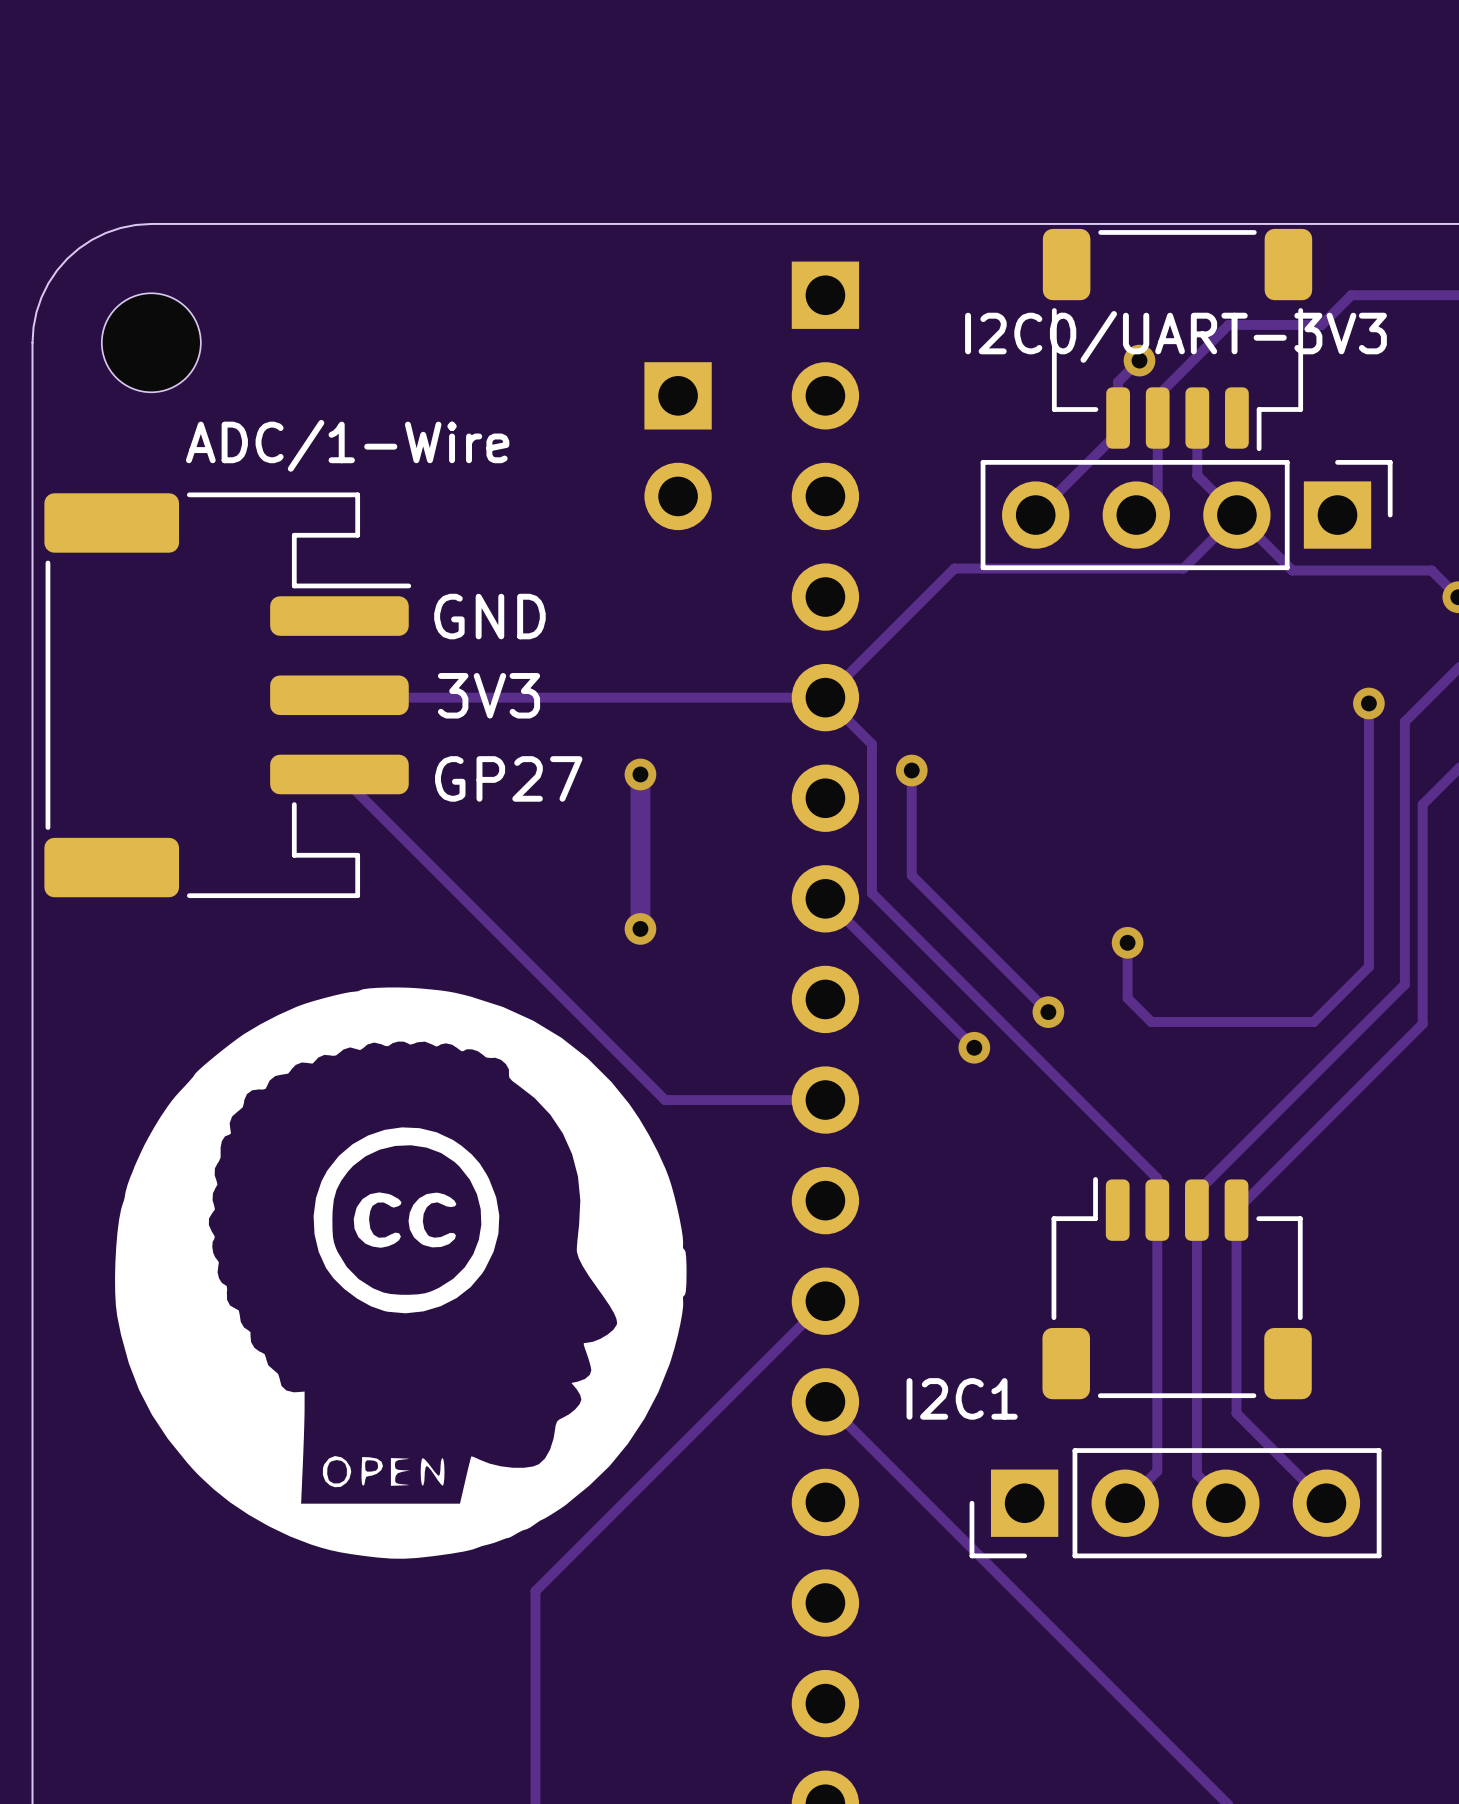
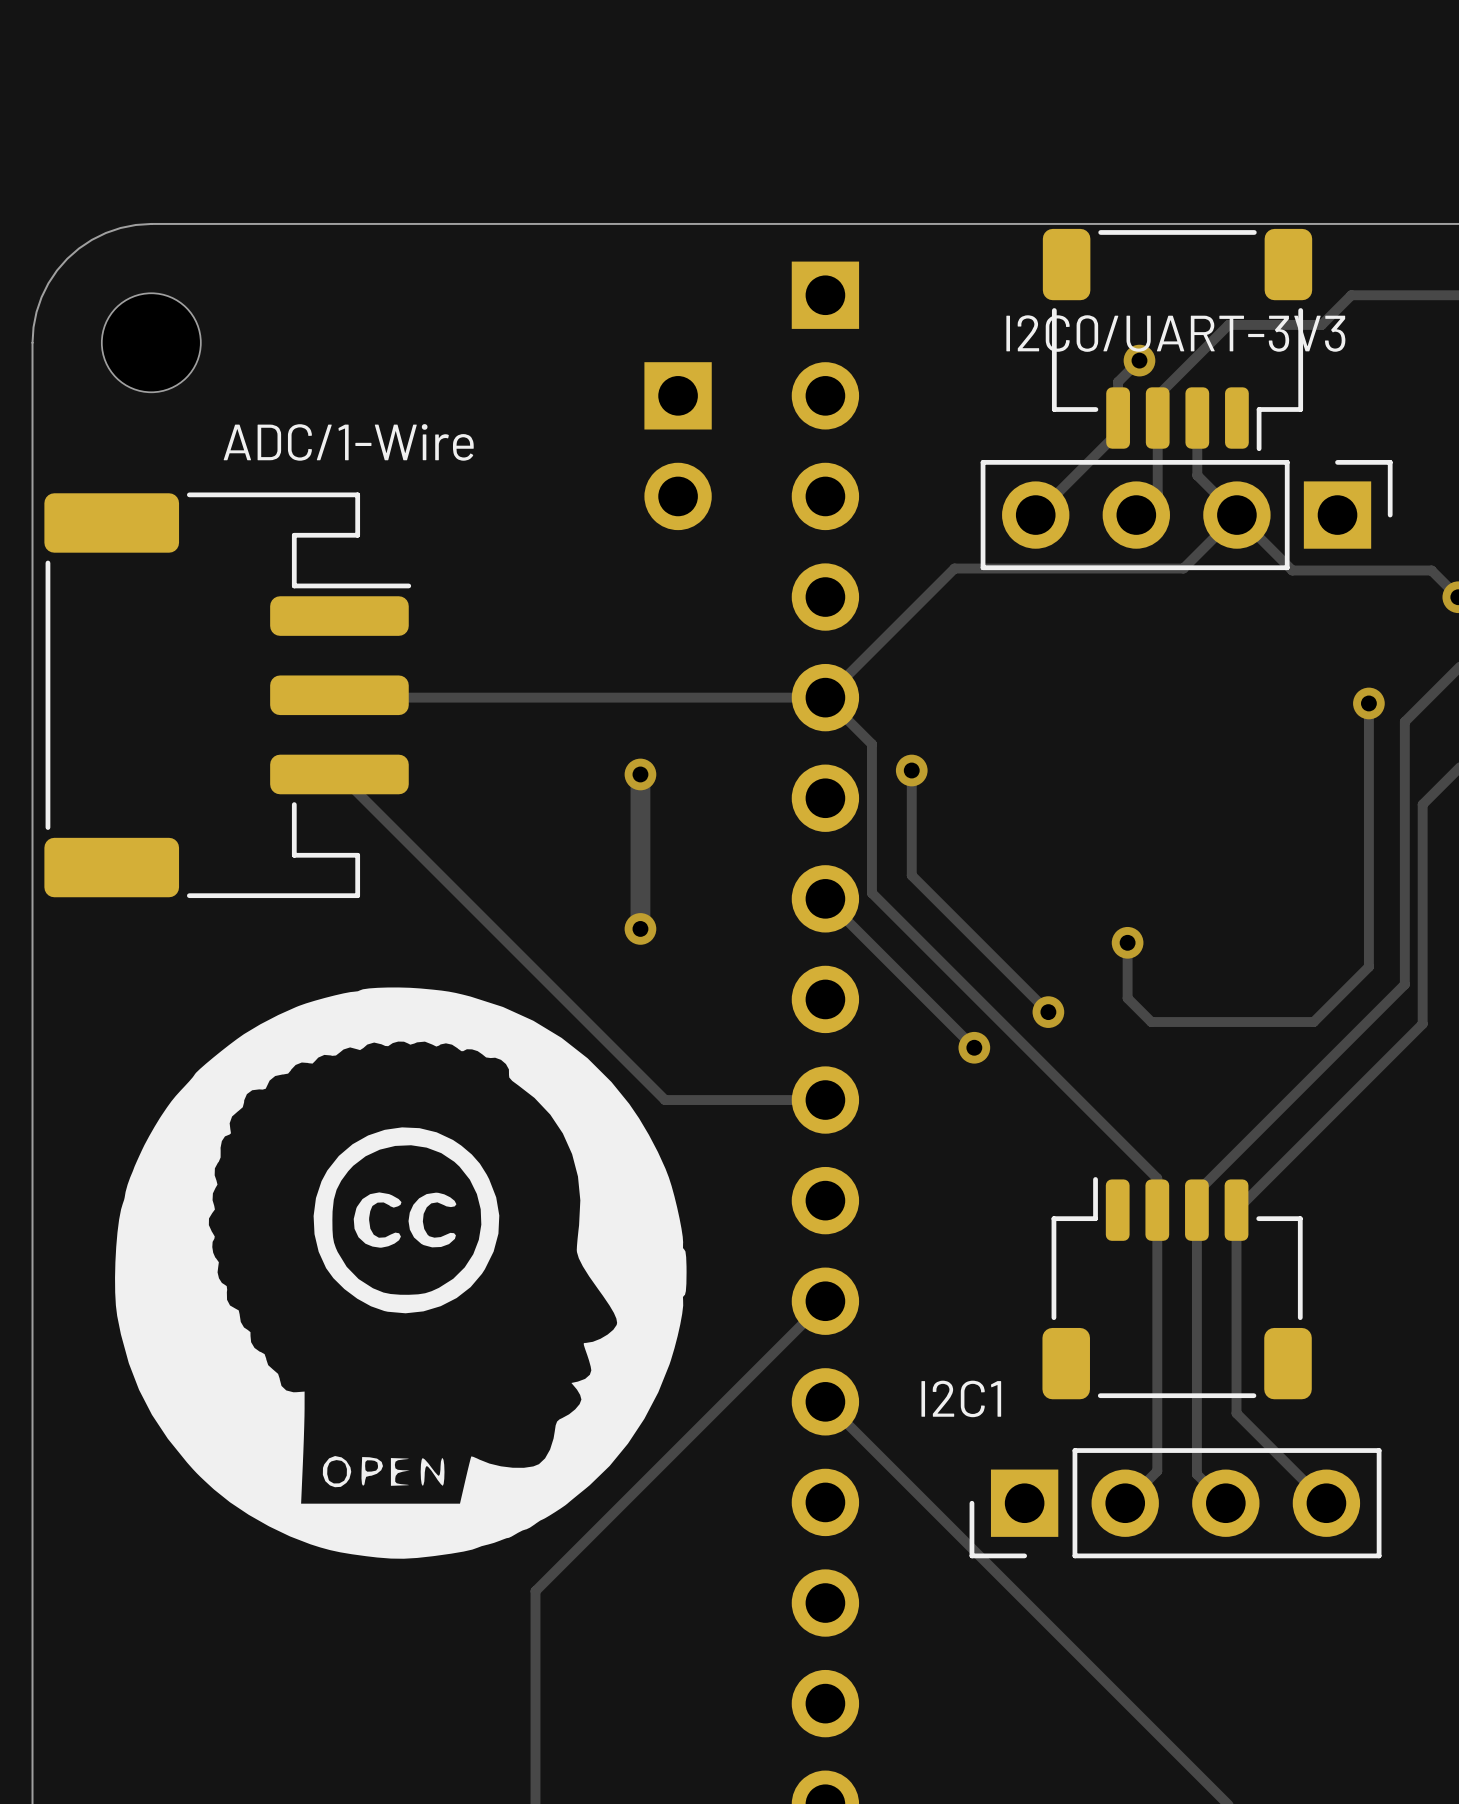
text: GND (489, 616) -> none
text: 3V3 (489, 695) -> none
text: GP27 (508, 778) -> none

